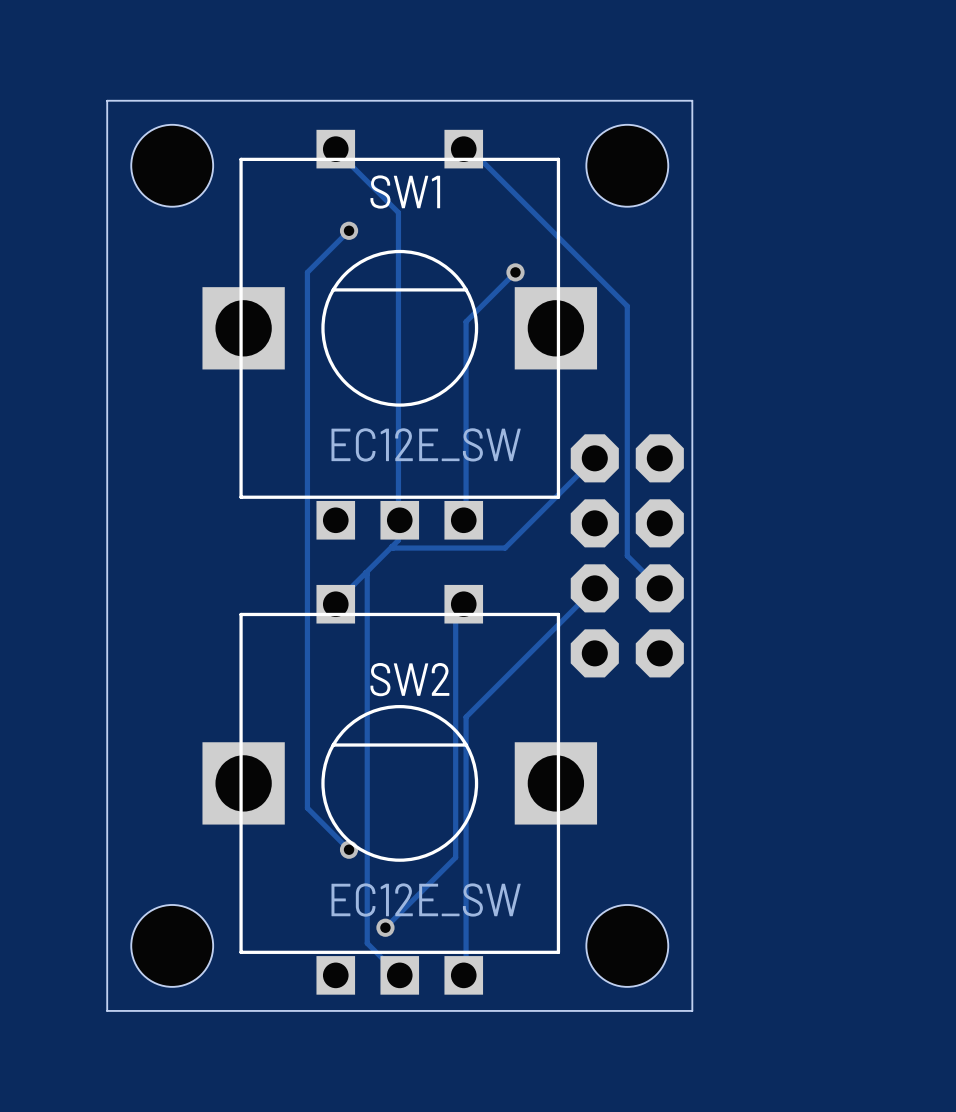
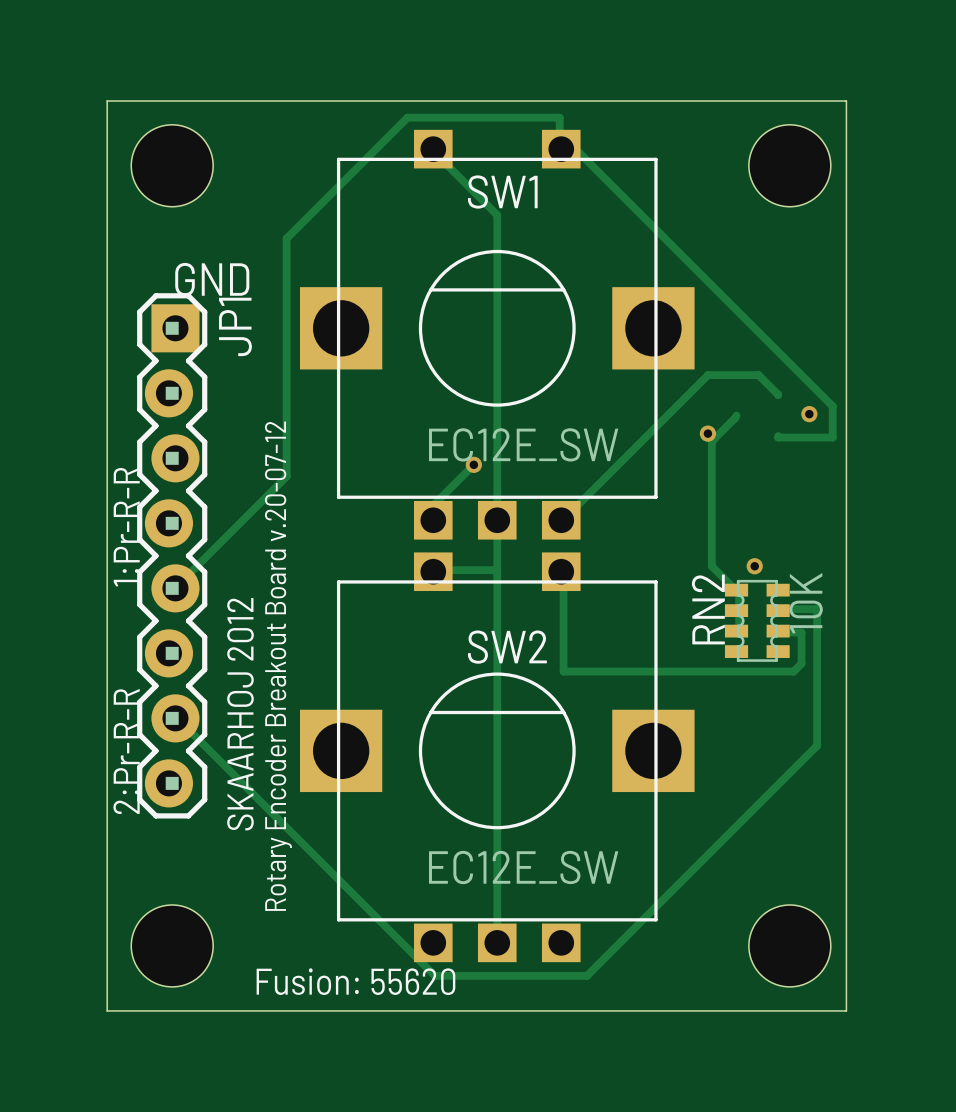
board edge: (107, 100) (692, 100) (692, 1010) -> (107, 101) (846, 101) (846, 1010) (692, 1010)
track: (335, 149) (398, 212) (399, 520) (398, 540) (335, 604) -> none
track: none -> (433, 149) (497, 215) (497, 942)
track: (463, 149) (471, 150) (627, 306) (627, 555) (659, 588) -> none
hole position: (627, 165) -> (789, 165)
track: (349, 230) (307, 272) (307, 808) (349, 849) -> none
via: (349, 230) -> none
track: (515, 272) (466, 321) (466, 519) (463, 520) -> none
via: (515, 272) -> none
text: none -> GND (212, 279)
SW1 position: (399, 334) -> (497, 334)
track: none -> (778, 394) (758, 375) (707, 375) (561, 520)
via: none -> (809, 414)
track: none -> (736, 415) (711, 441) (711, 566) (739, 593) (739, 609) (736, 610) (739, 613) (739, 628) (736, 631)
via: none -> (707, 433)
track: none -> (778, 436) (832, 437) (832, 406) (579, 152) (563, 152) (559, 148) (559, 117) (407, 117) (286, 238) (286, 476) (175, 588)
track: (594, 458) (505, 548) (391, 546) -> none
track: none -> (473, 464) (434, 503) (433, 520)
via: none -> (473, 464)
text: none -> 1:Pr-R-R (126, 527)
JP1: none -> (172, 555)
part: (627, 555) -> none
via: none -> (754, 566)
track: none -> (497, 570) (434, 570) (433, 571)
track: none -> (561, 571) (563, 574) (563, 671) (793, 671) (801, 663) (801, 632) (778, 631)
track: (365, 572) (367, 943) (399, 975) -> none
track: (594, 588) (466, 717) (466, 974) (463, 975) -> none
track: (463, 604) (455, 613) (455, 857) (385, 927) -> none
track: none -> (778, 610) (817, 609) (817, 745) (587, 975) (434, 975) (175, 718)
RN2: none -> 10K (757, 620)
text: none -> Rotary Encoder Breakout Board v.20-07-12 (278, 666)
text: none -> SKAARHOJ 2012 (240, 714)
text: none -> 2:Pr-R-R (126, 751)
SW2 position: (399, 789) -> (497, 757)
via: (349, 849) -> none
via: (385, 927) -> none
hole position: (627, 945) -> (789, 945)
text: none -> Fusion: 55620 (355, 981)

